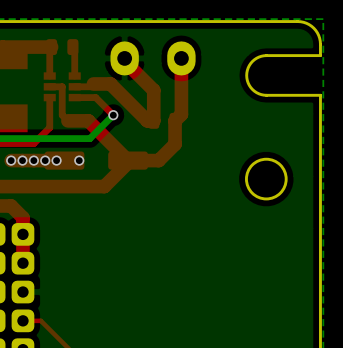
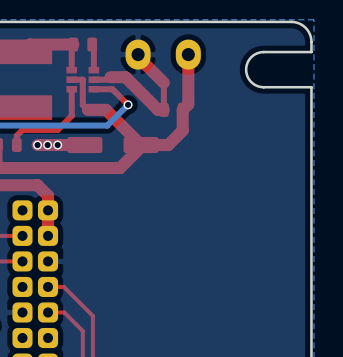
top track width: thick (153, 90) (153, 120) -> thin (163, 82) (163, 109)
round board edge: [245, 157, 288, 201] -> none
via: (45, 160) -> none
via: (56, 160) -> none
via: (79, 160) -> none

